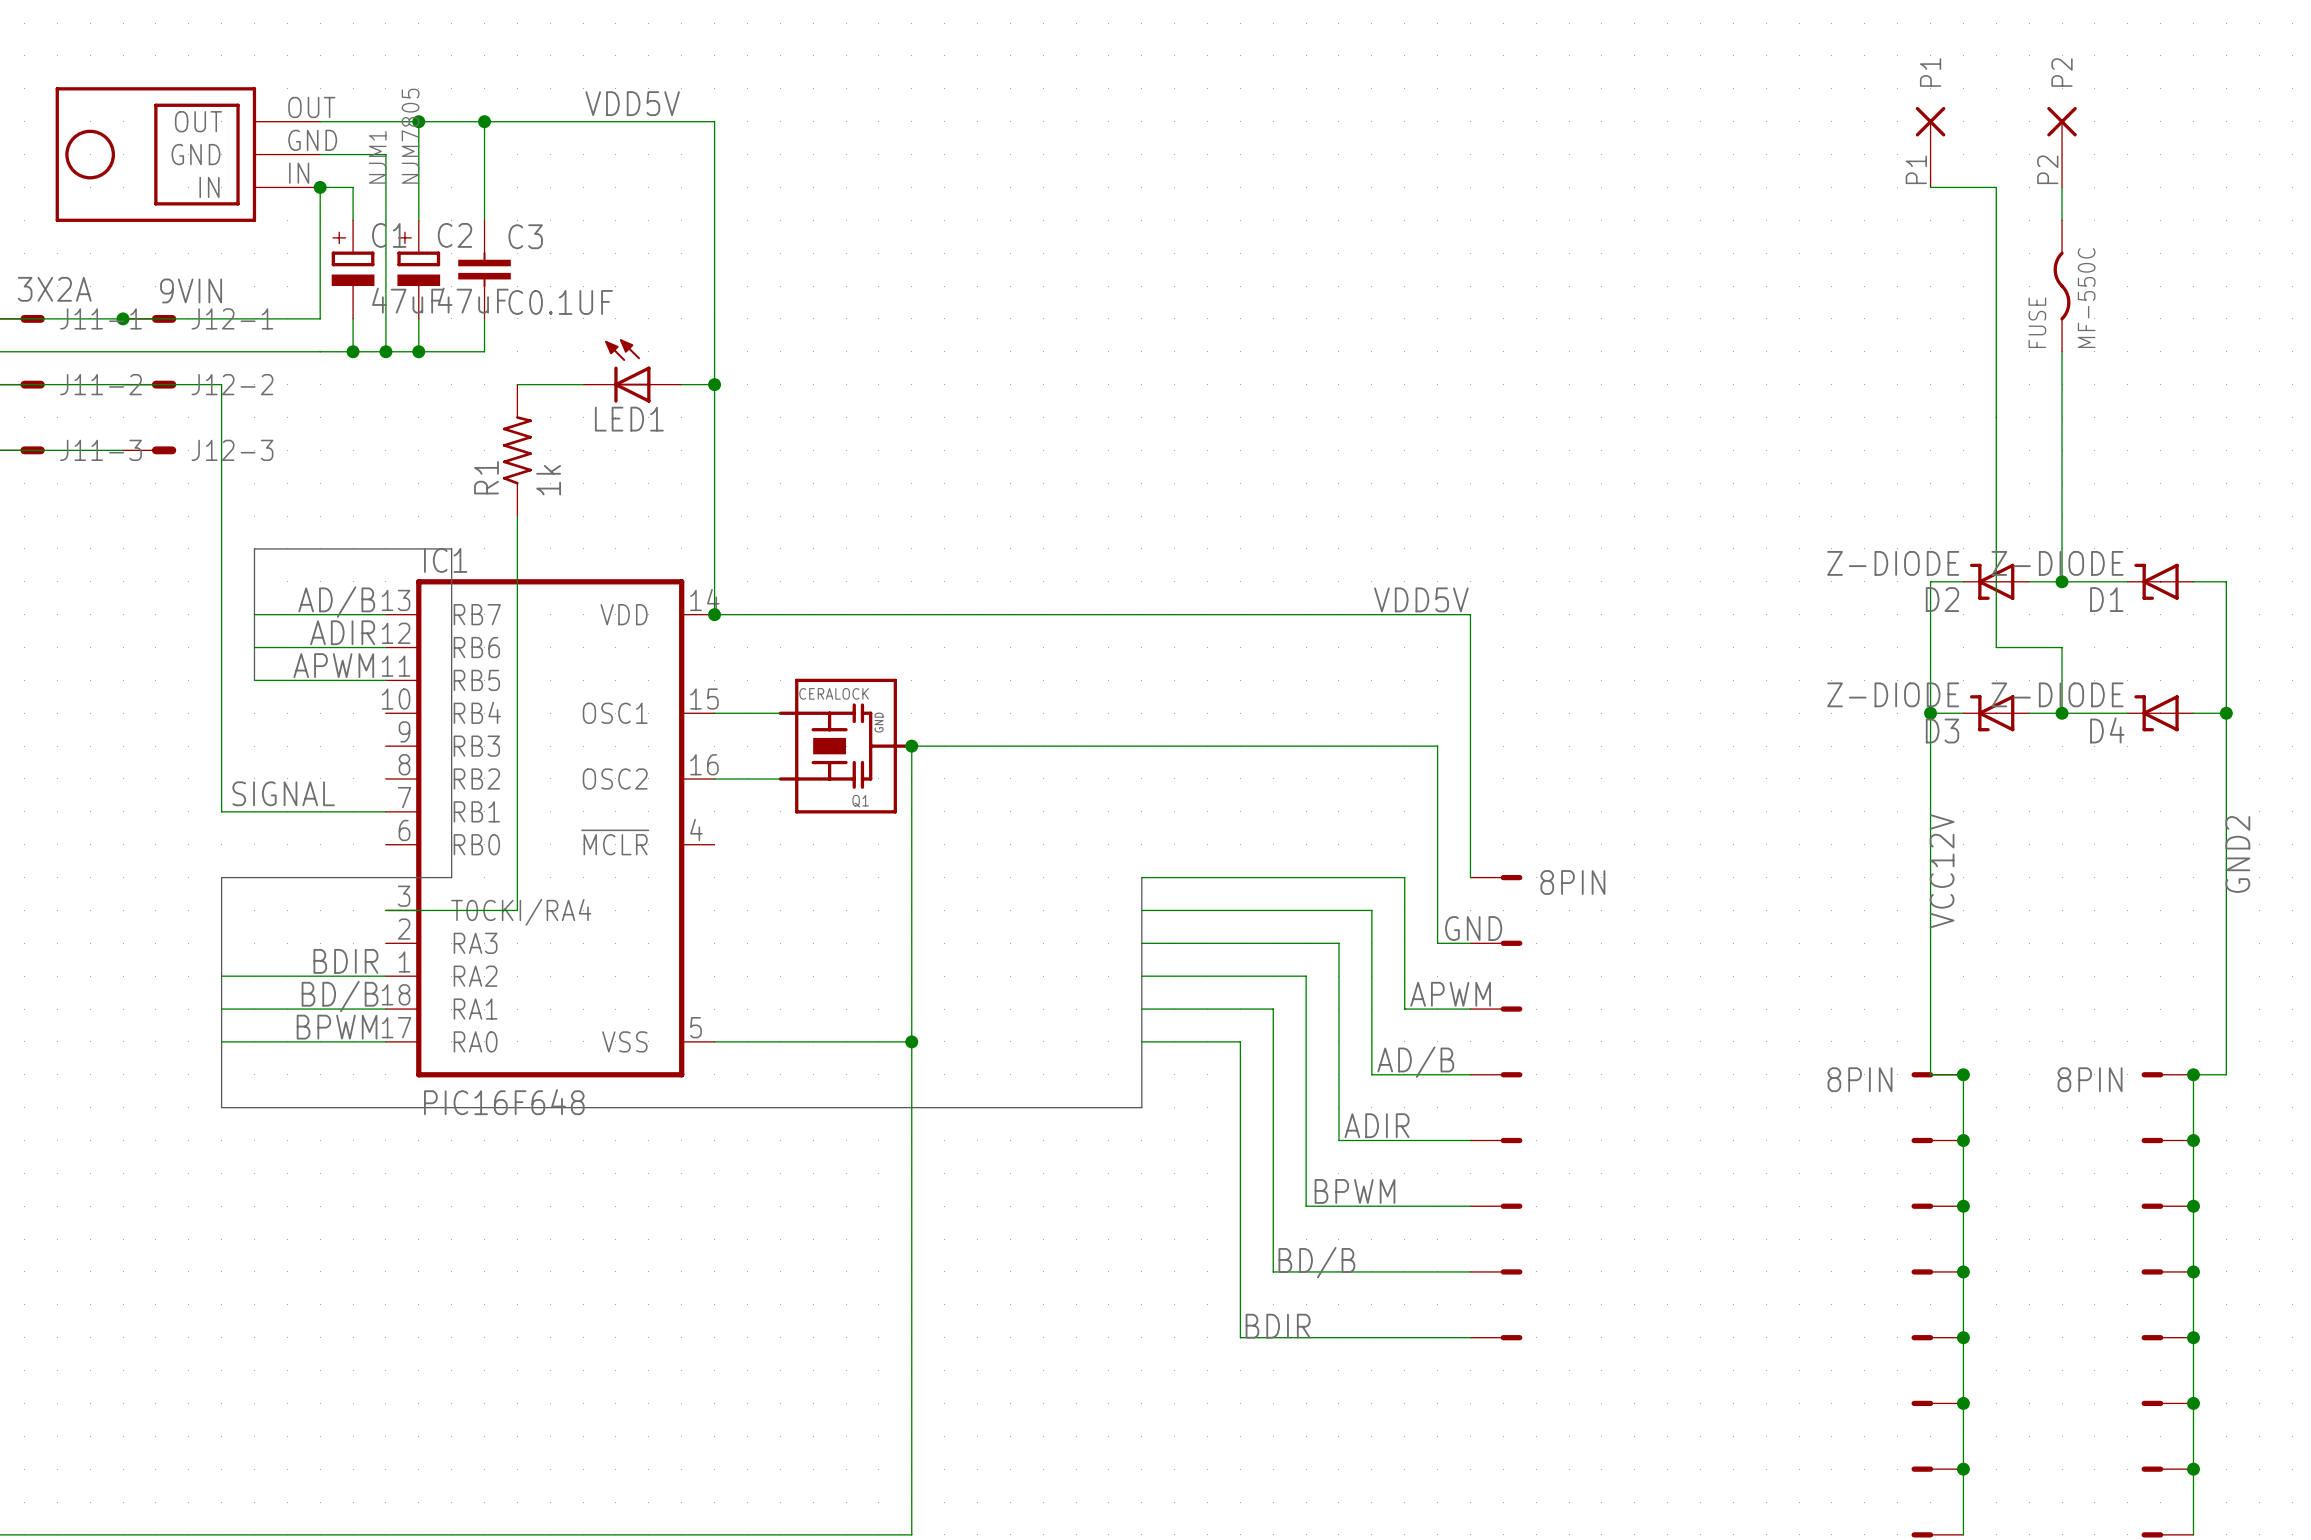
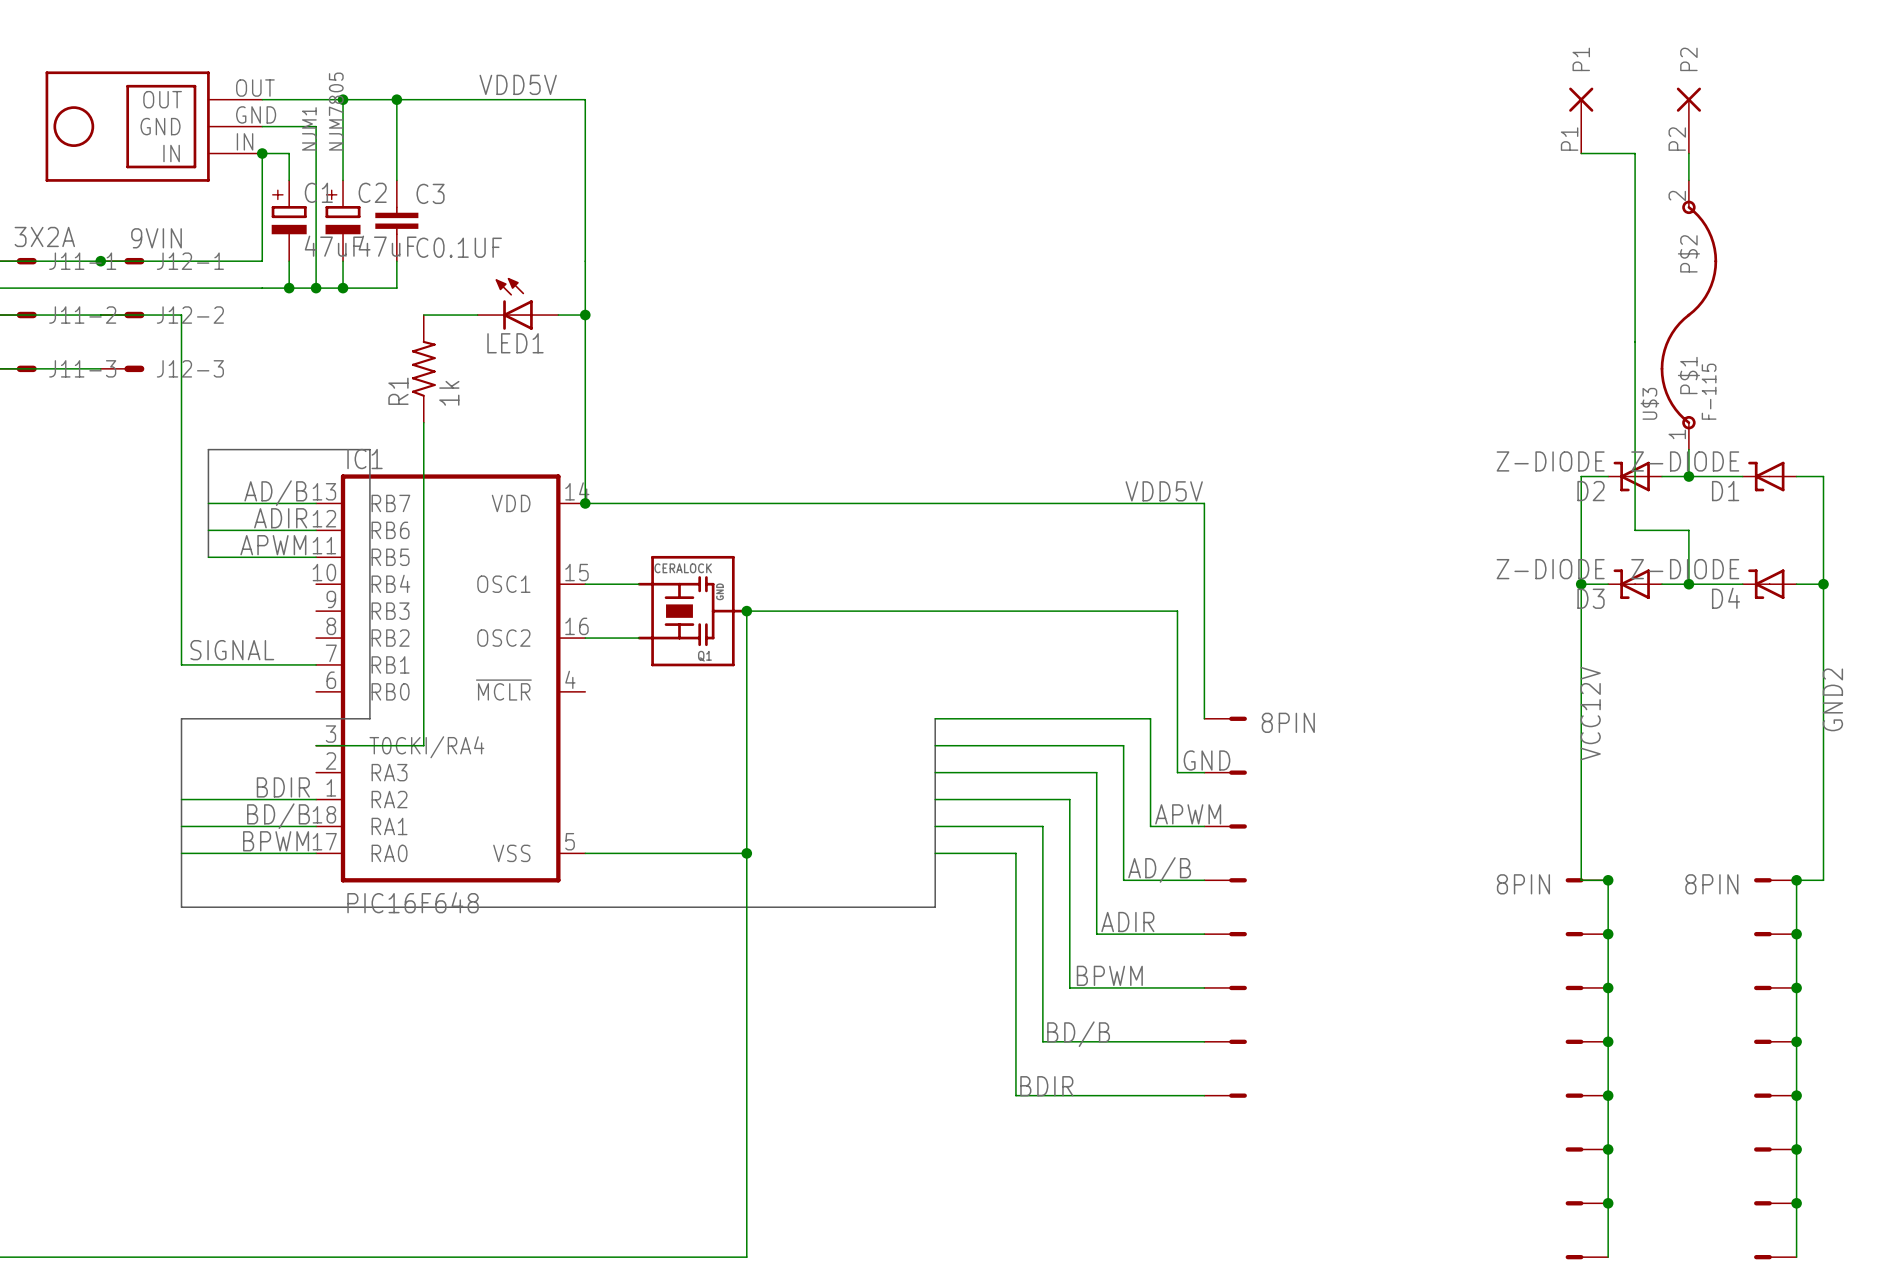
FUSE: MF-550C (2062, 286) -> none
wire: (2062, 351) (2062, 548) -> none
U$3: none -> F-115 (1688, 315)

